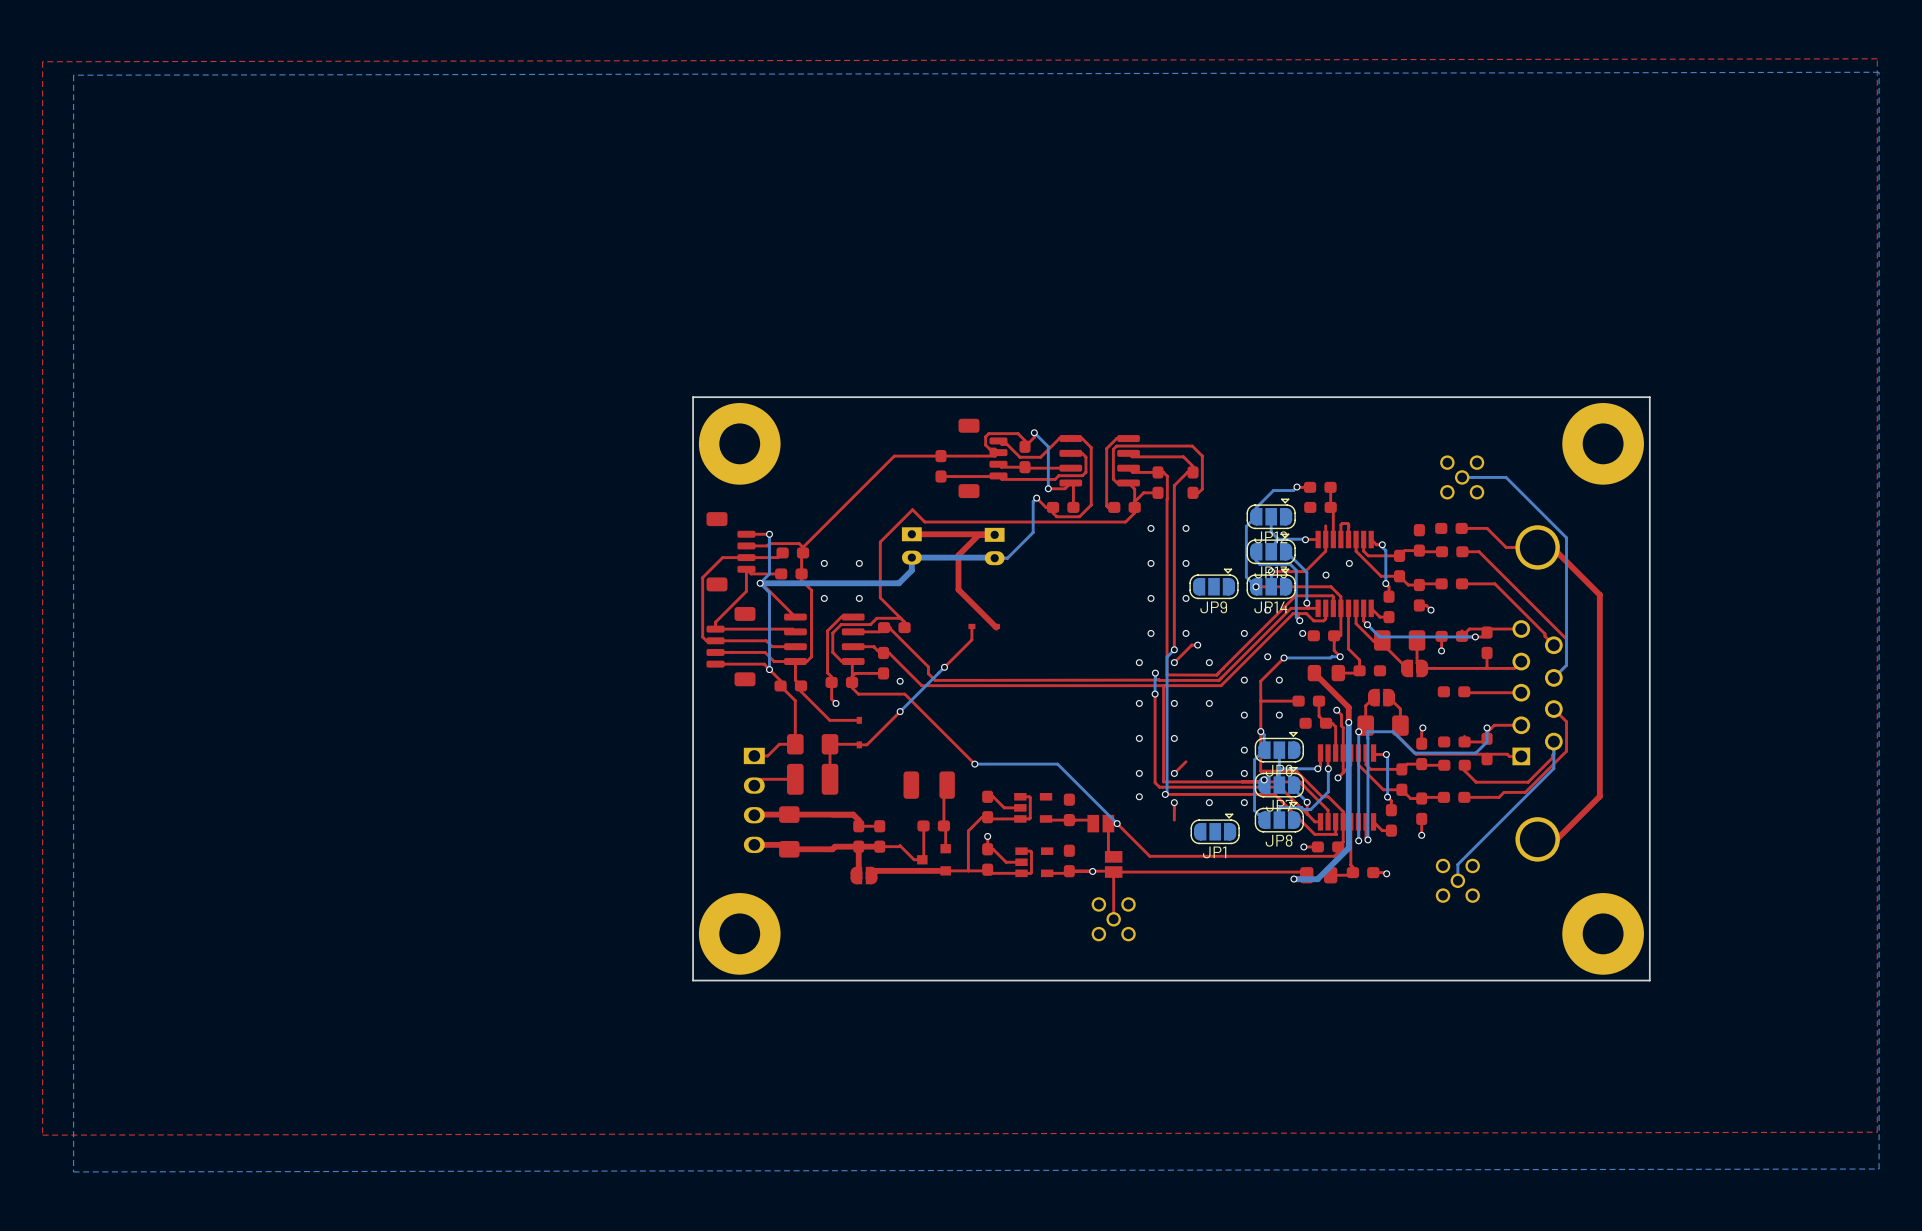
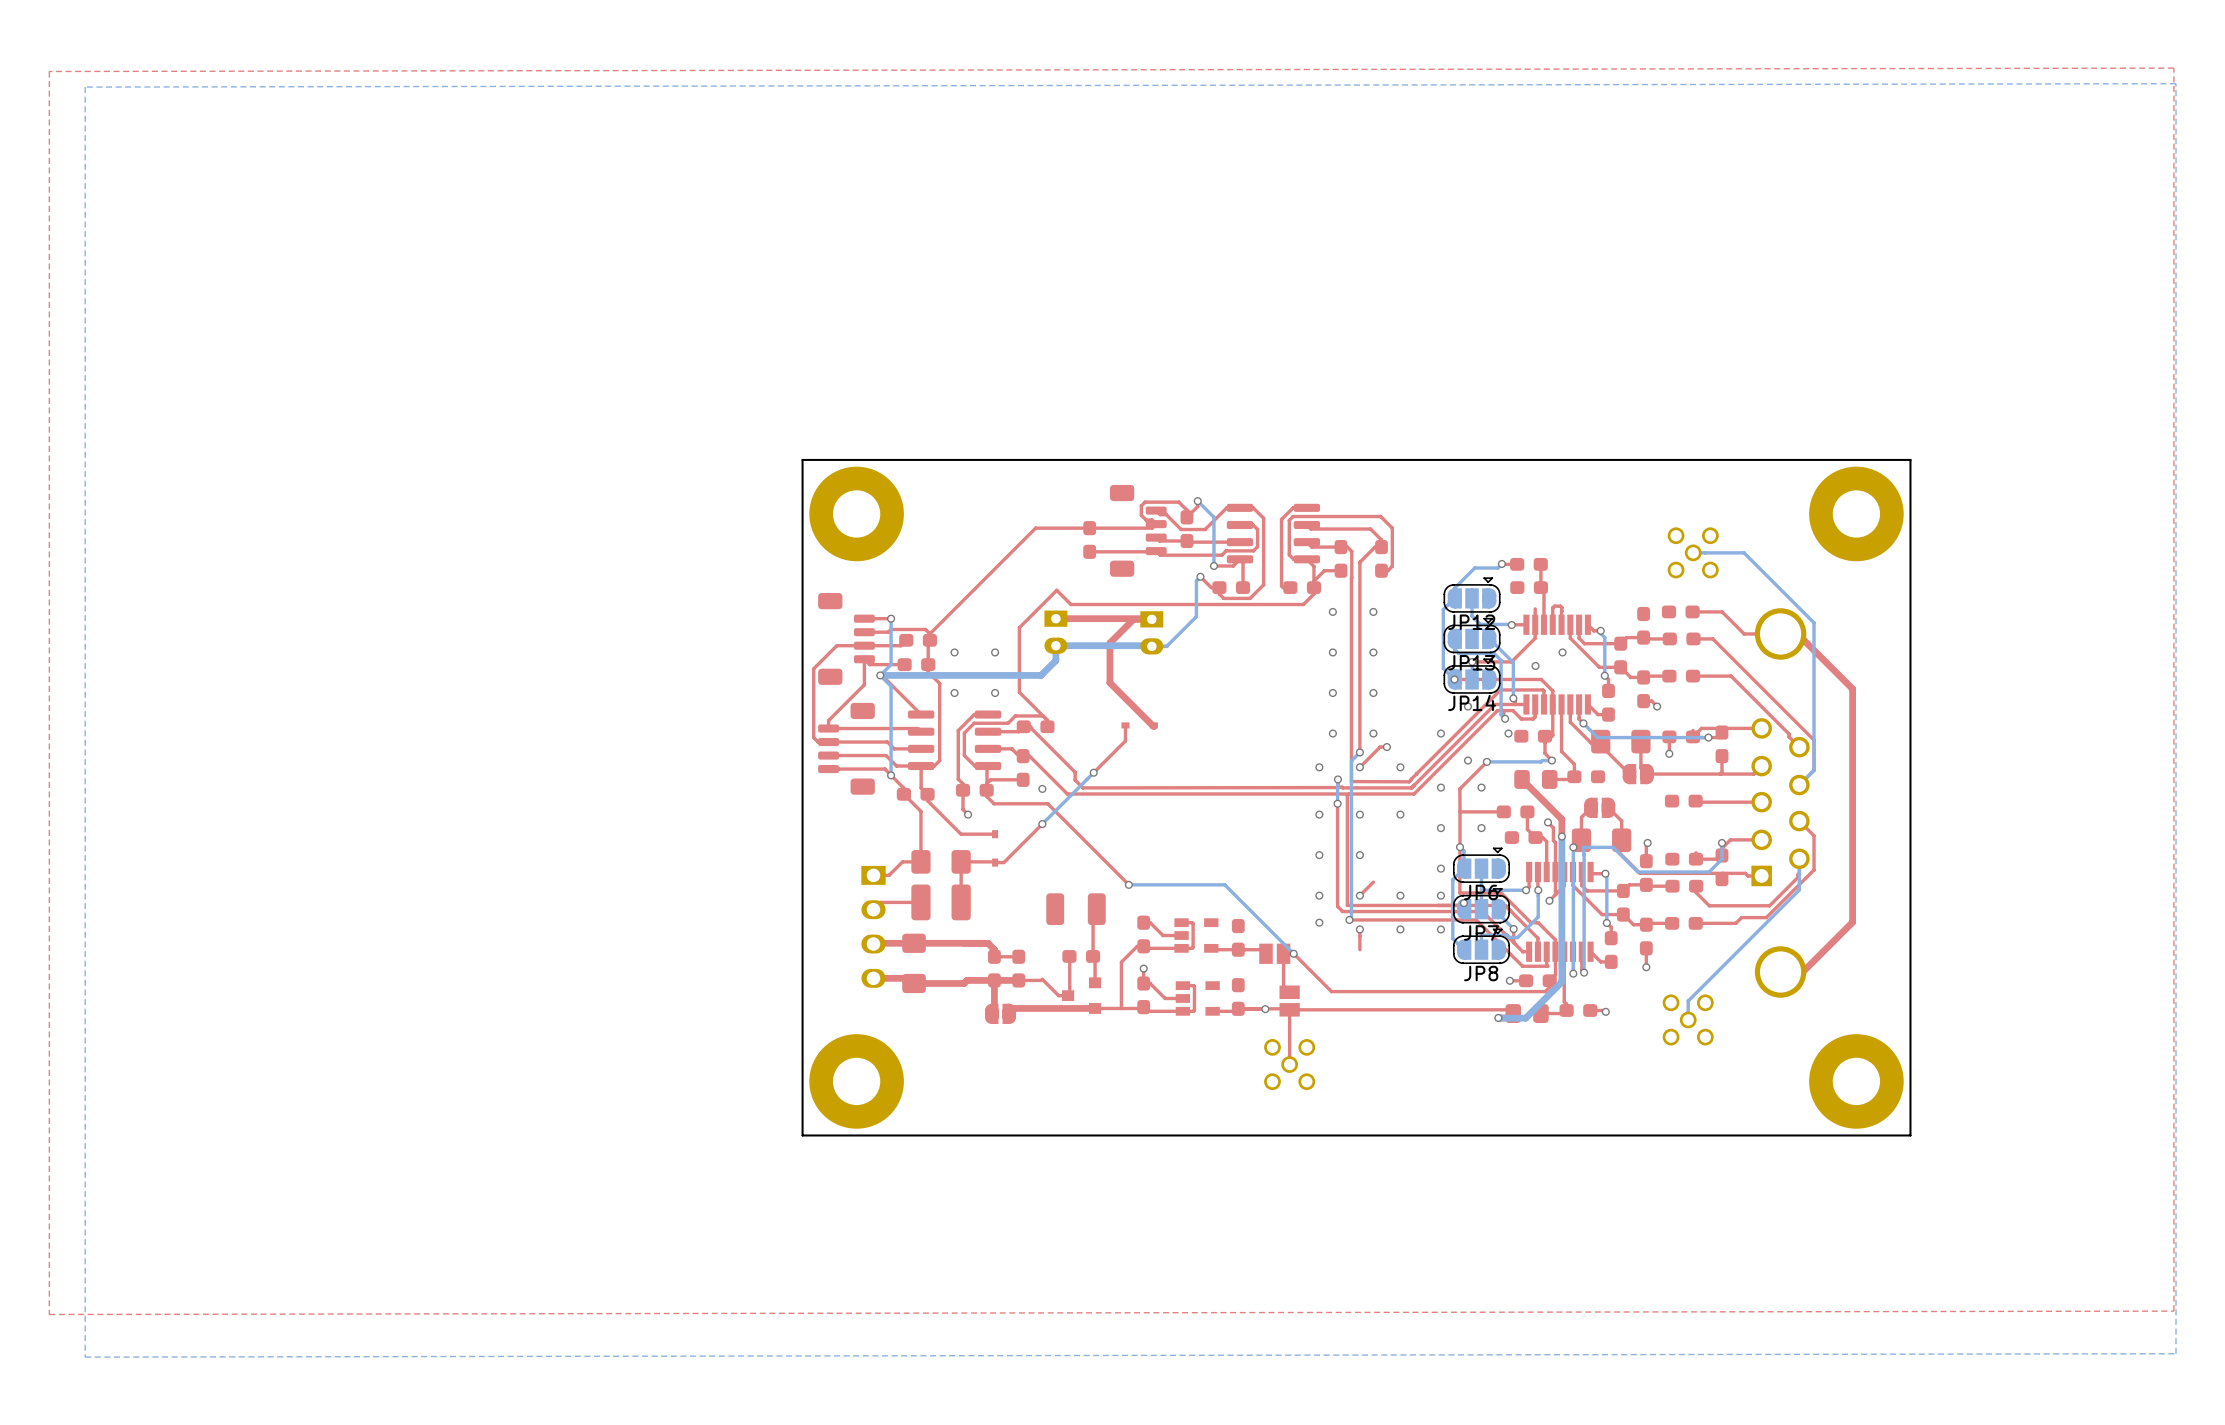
JP9: (1214, 583) -> none
JP1: (1215, 828) -> none

